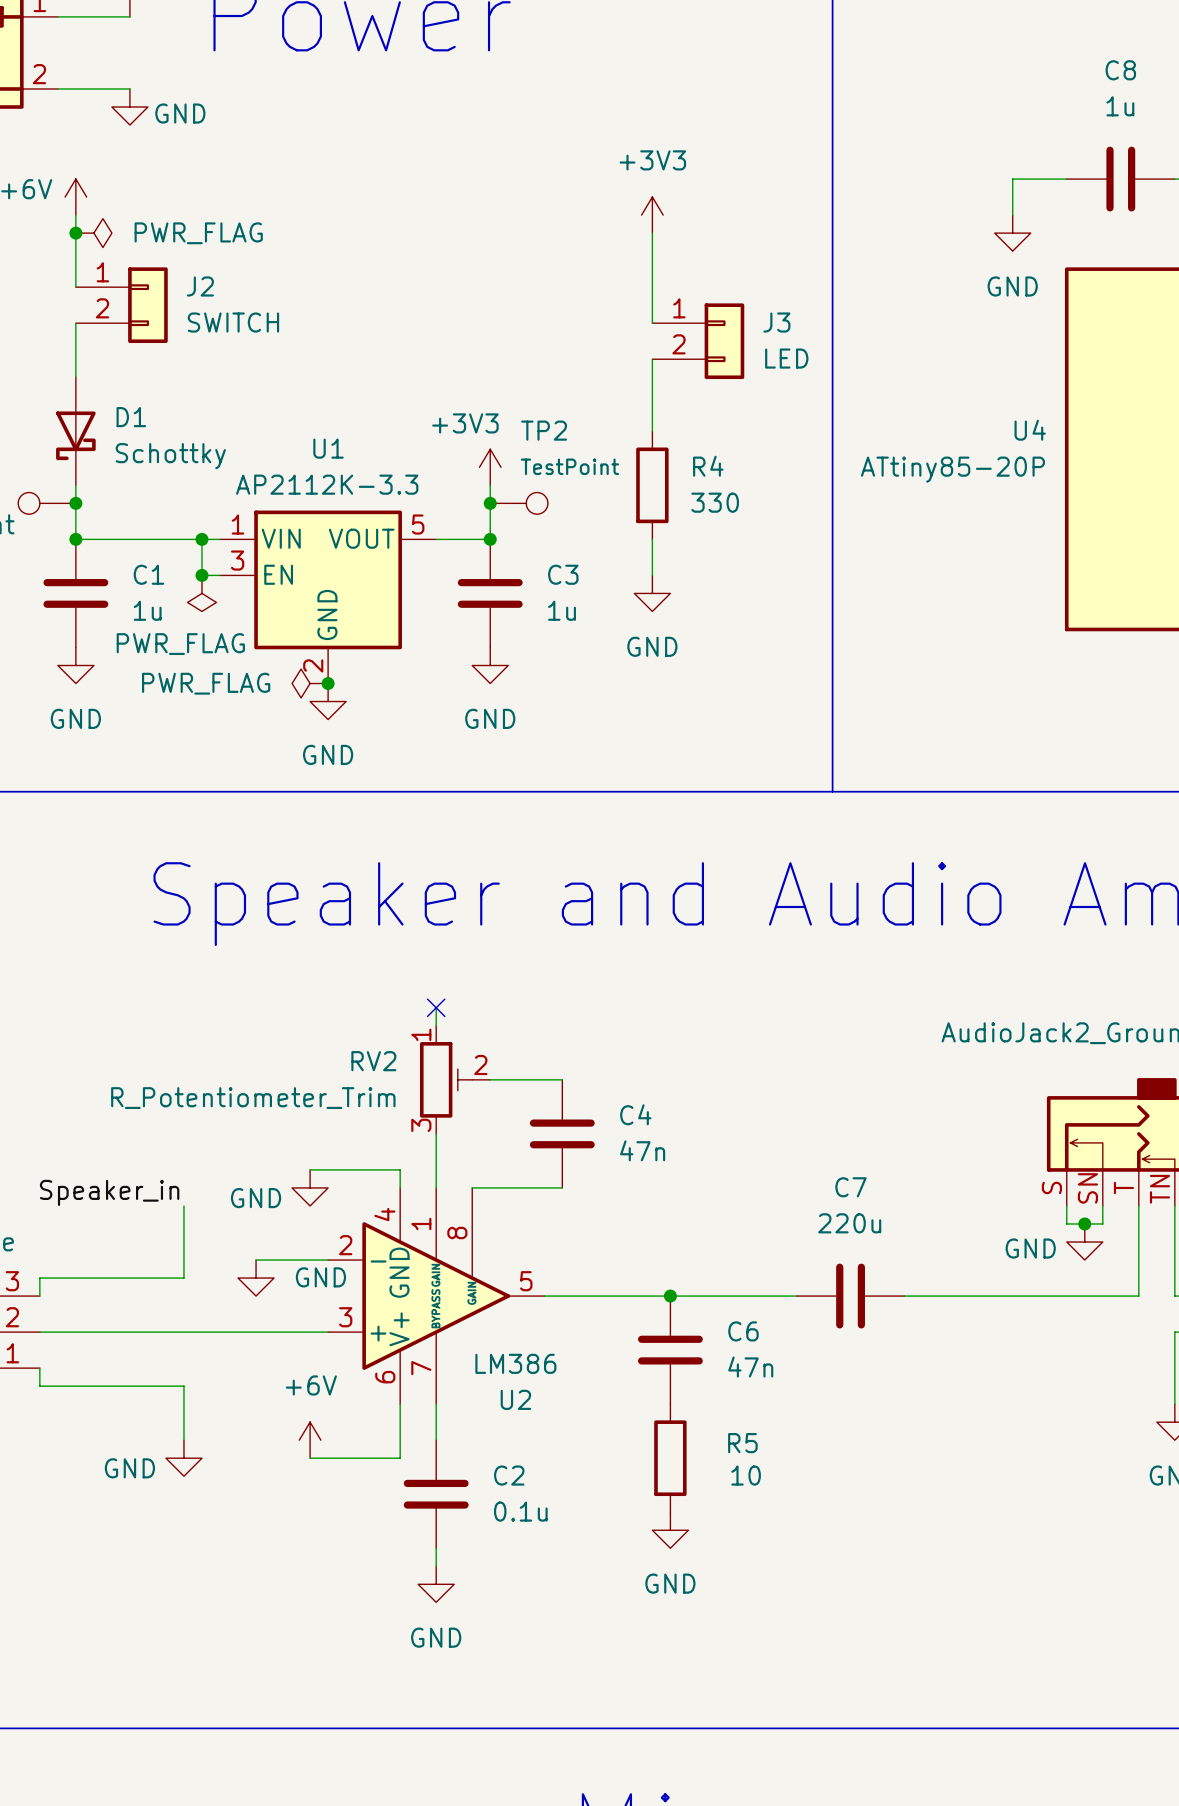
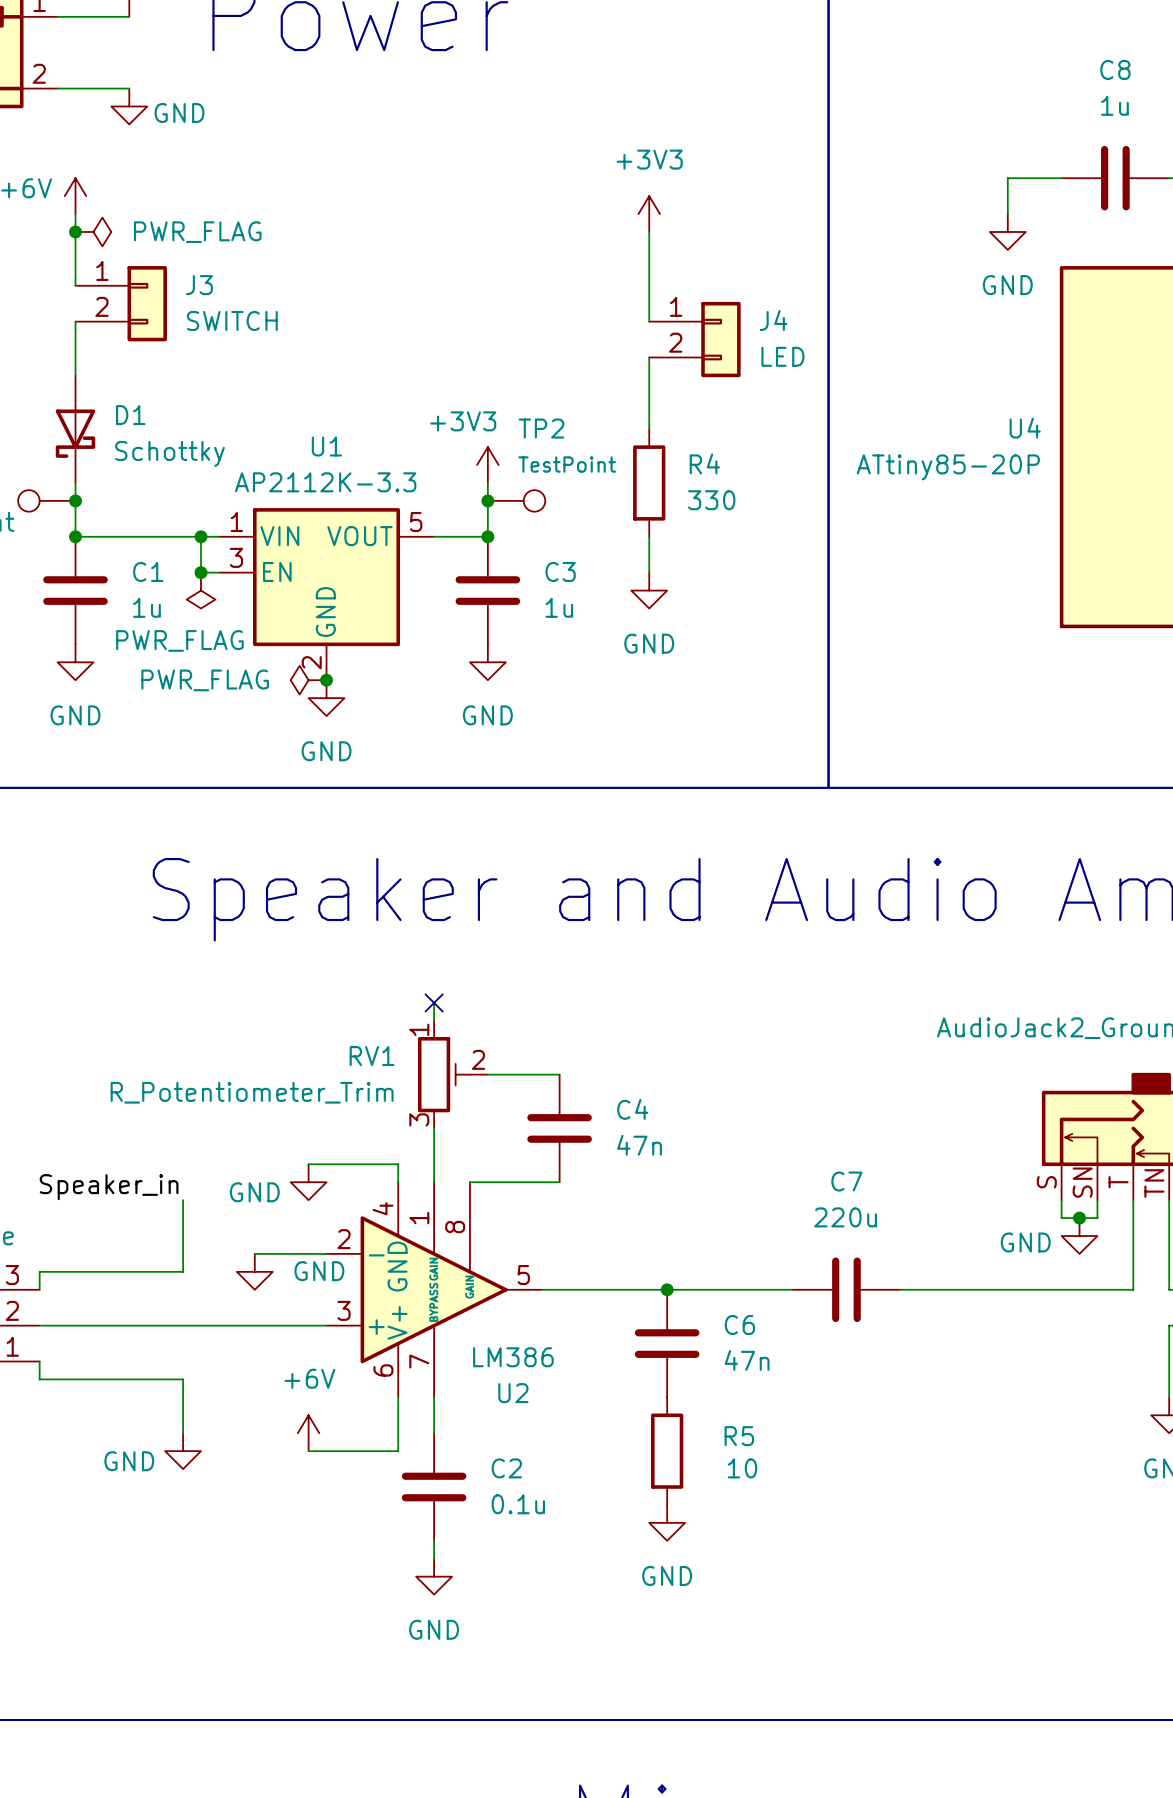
J2 name: J2 (200, 286) -> J3 (199, 285)
J3 name: J3 (776, 322) -> J4 (773, 320)
RV2 name: RV2 (373, 1061) -> RV1 (372, 1056)

